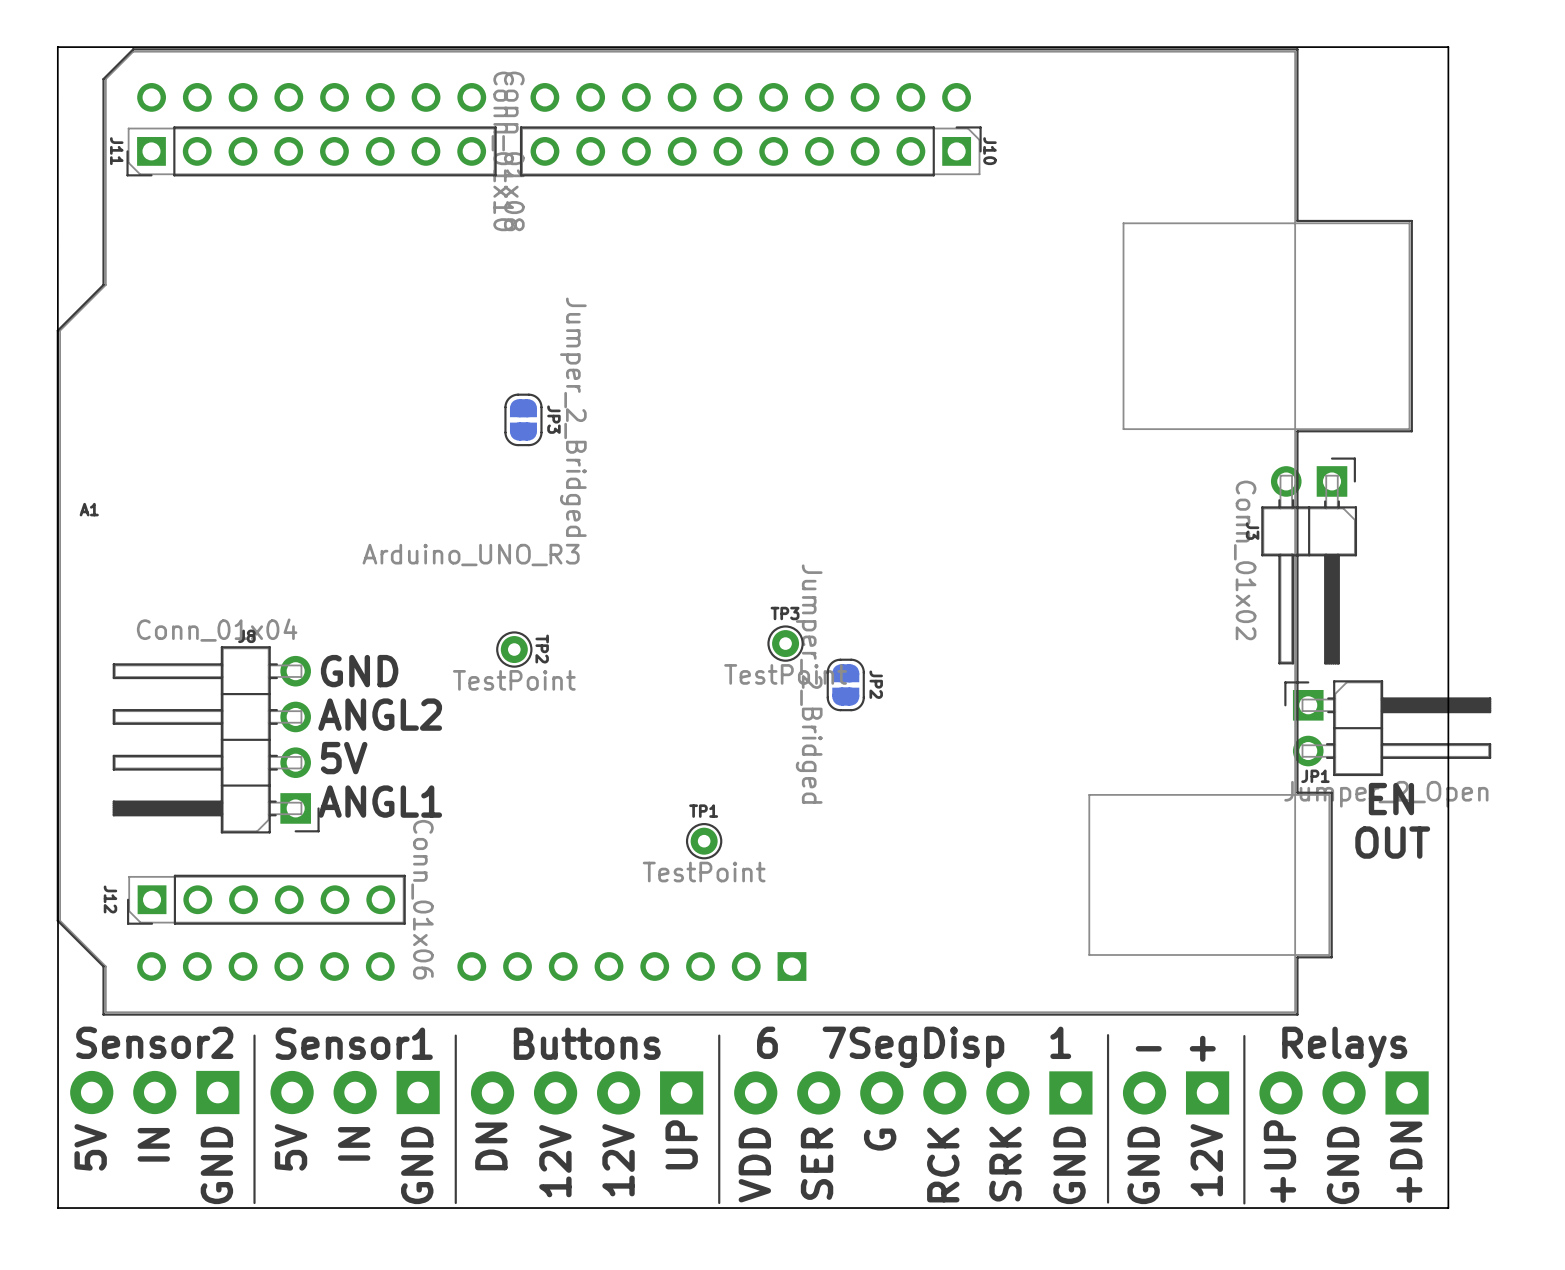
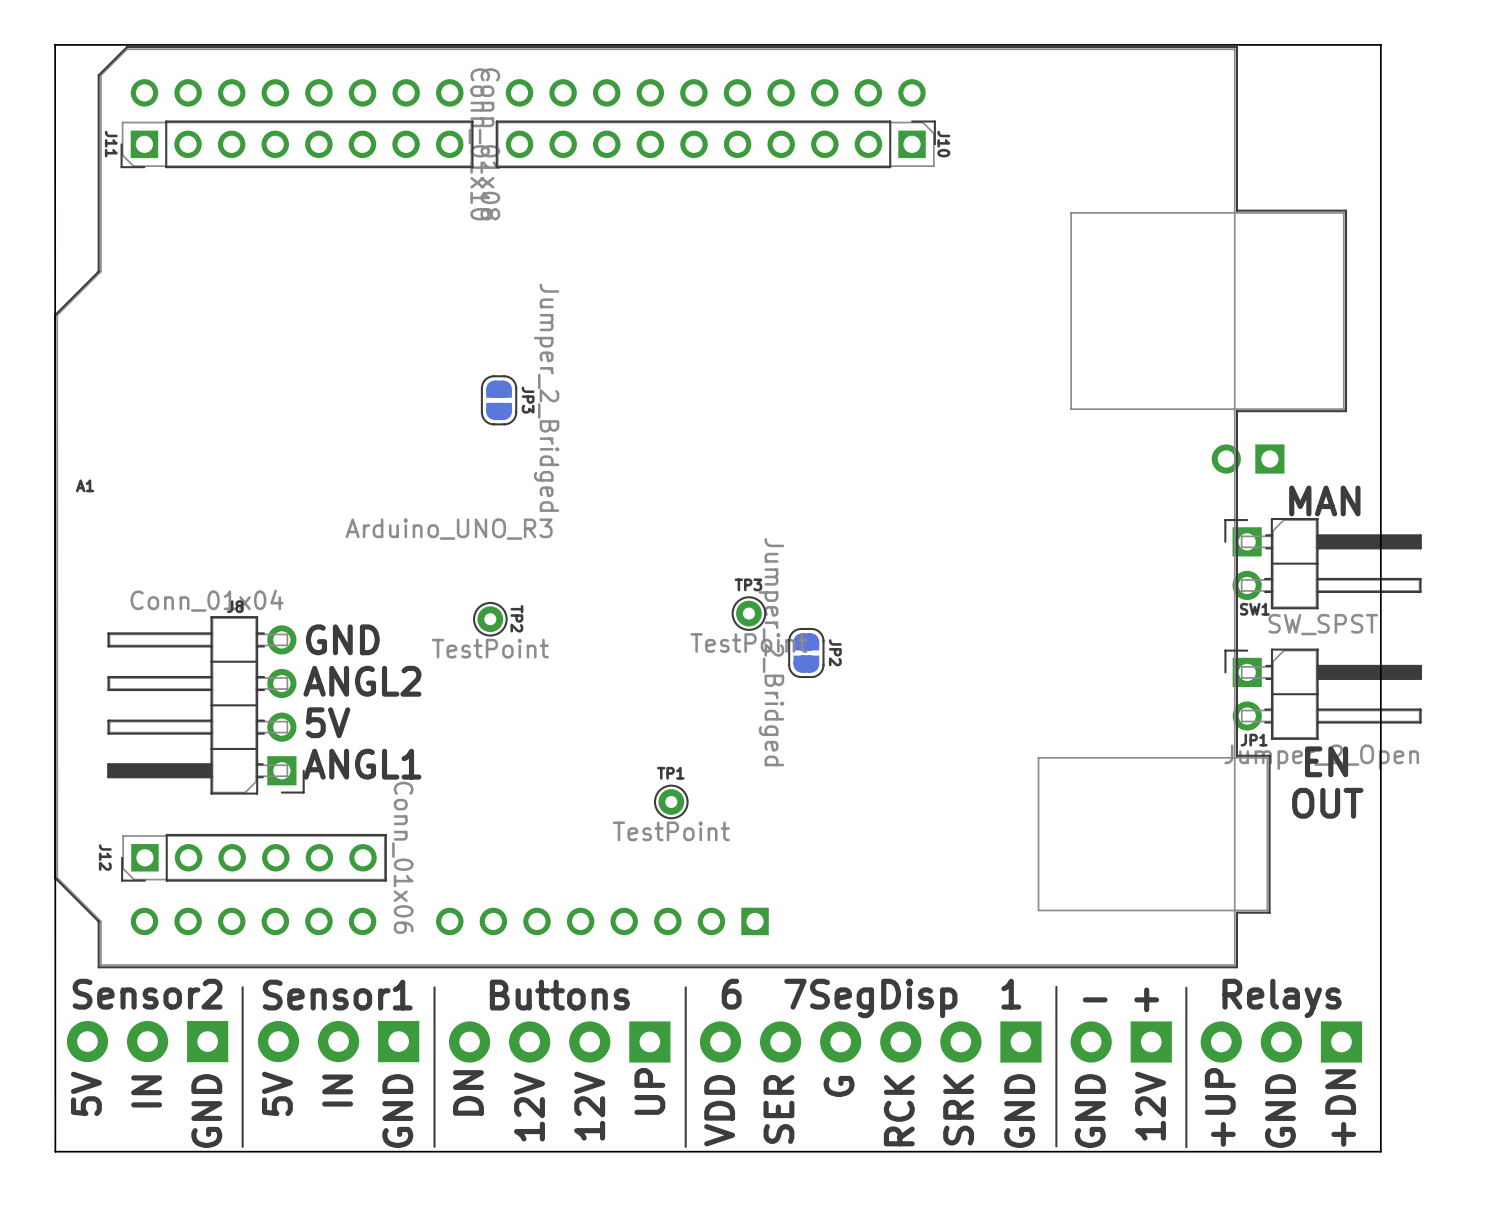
text: none -> MAN (1324, 500)
J3 side: bottom (1309, 560) -> top (1248, 459)
SW1: none -> SW_SPST (1322, 563)

